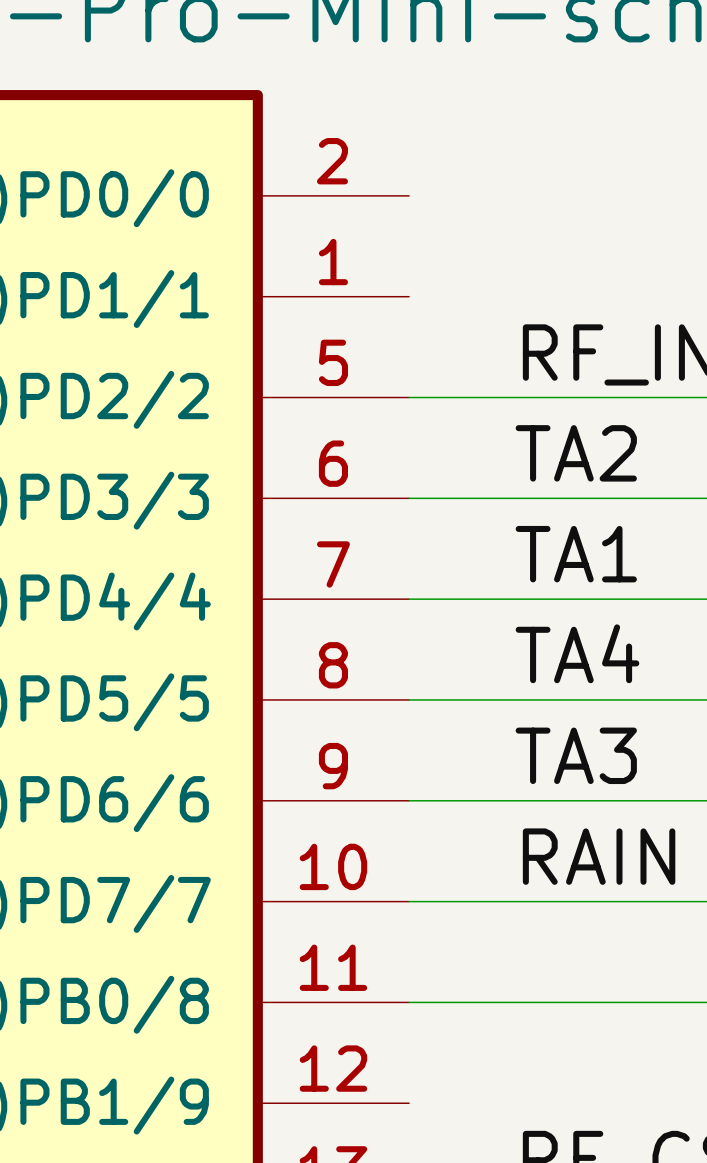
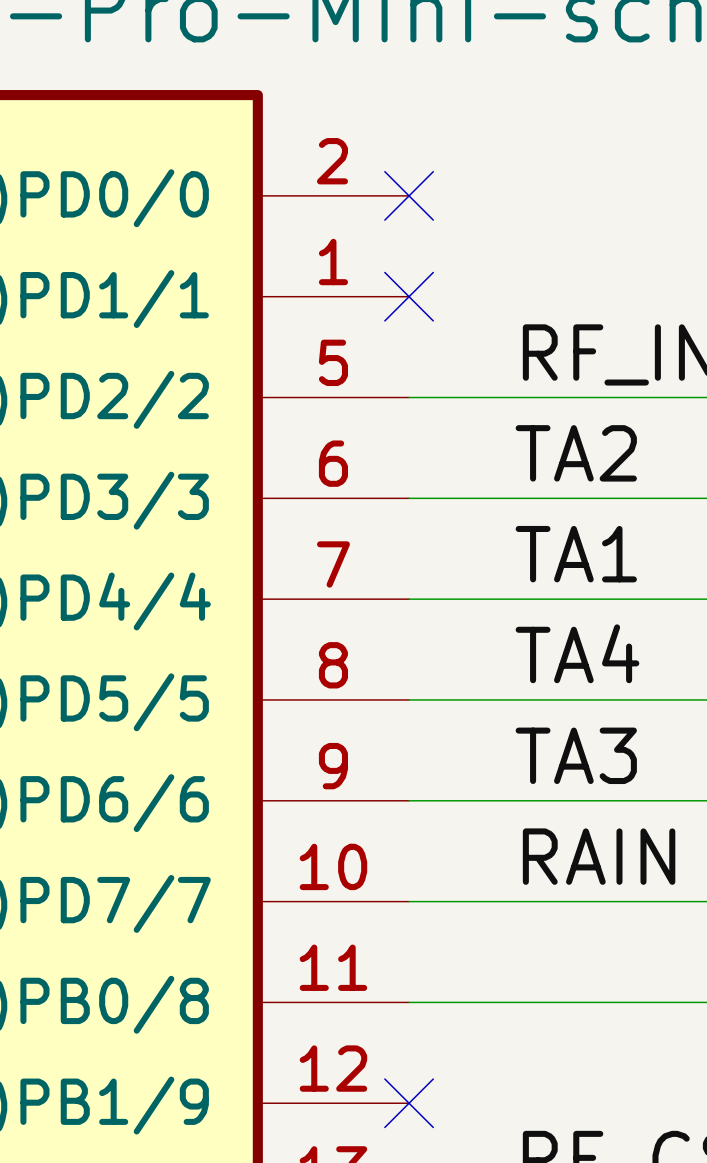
no-connect mark: none -> (409, 195)
no-connect mark: none -> (409, 296)
no-connect mark: none -> (409, 1103)

